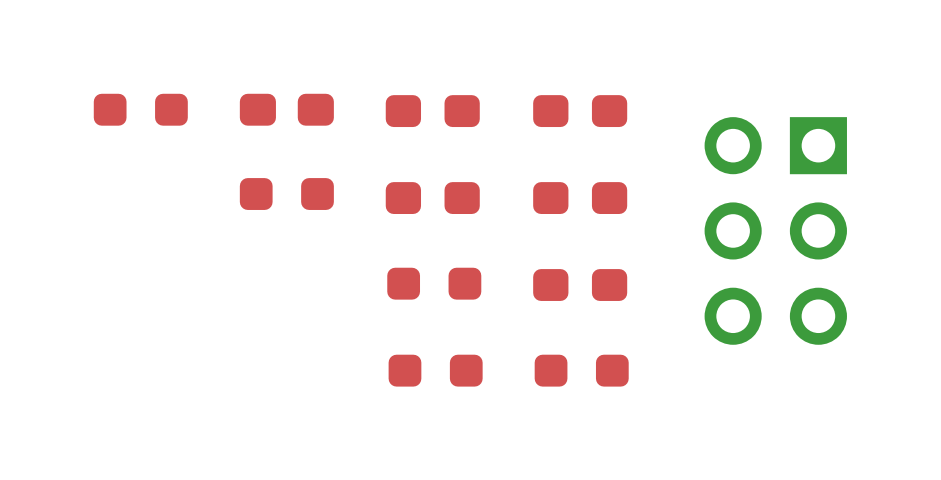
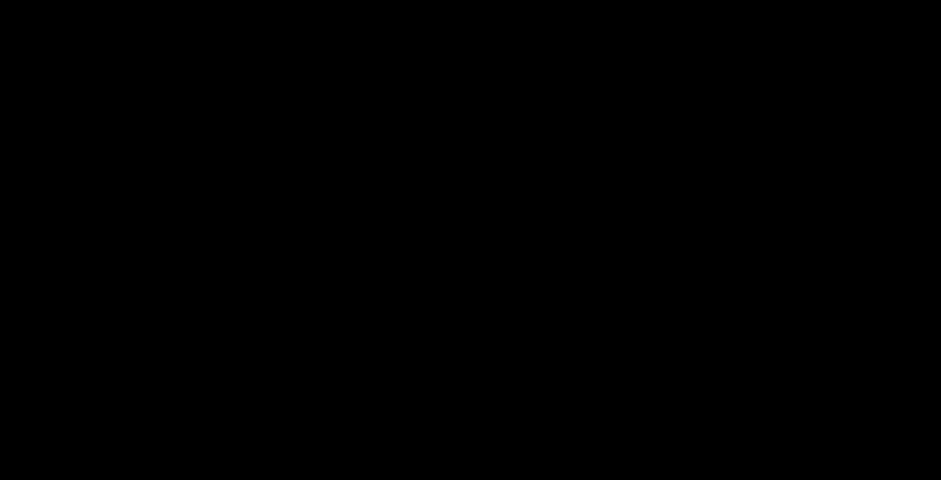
part: (140, 109) -> none
part: (286, 109) -> none
part: (432, 111) -> none
part: (580, 111) -> none
part: (286, 194) -> none
part: (432, 198) -> none
part: (580, 198) -> none
part: (775, 230) -> none
part: (434, 283) -> none
part: (580, 285) -> none
part: (435, 370) -> none
part: (581, 370) -> none

